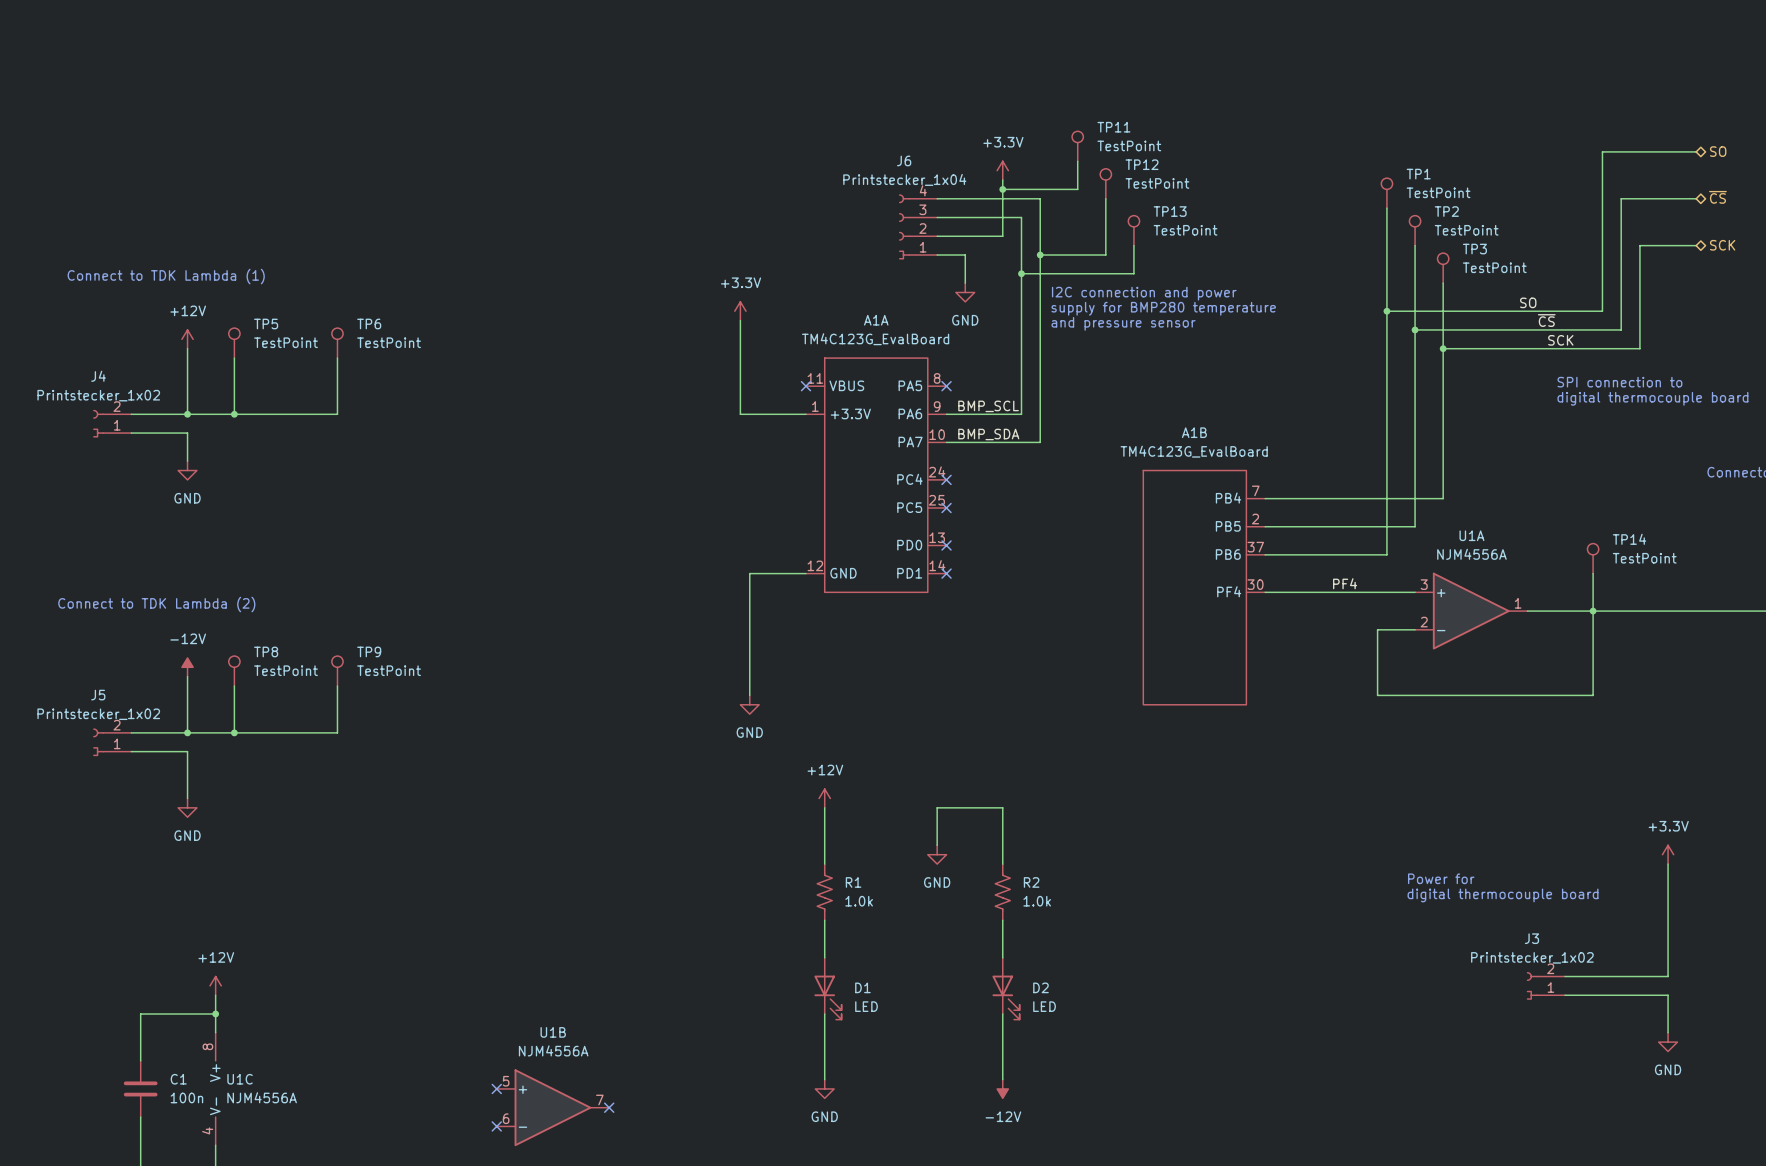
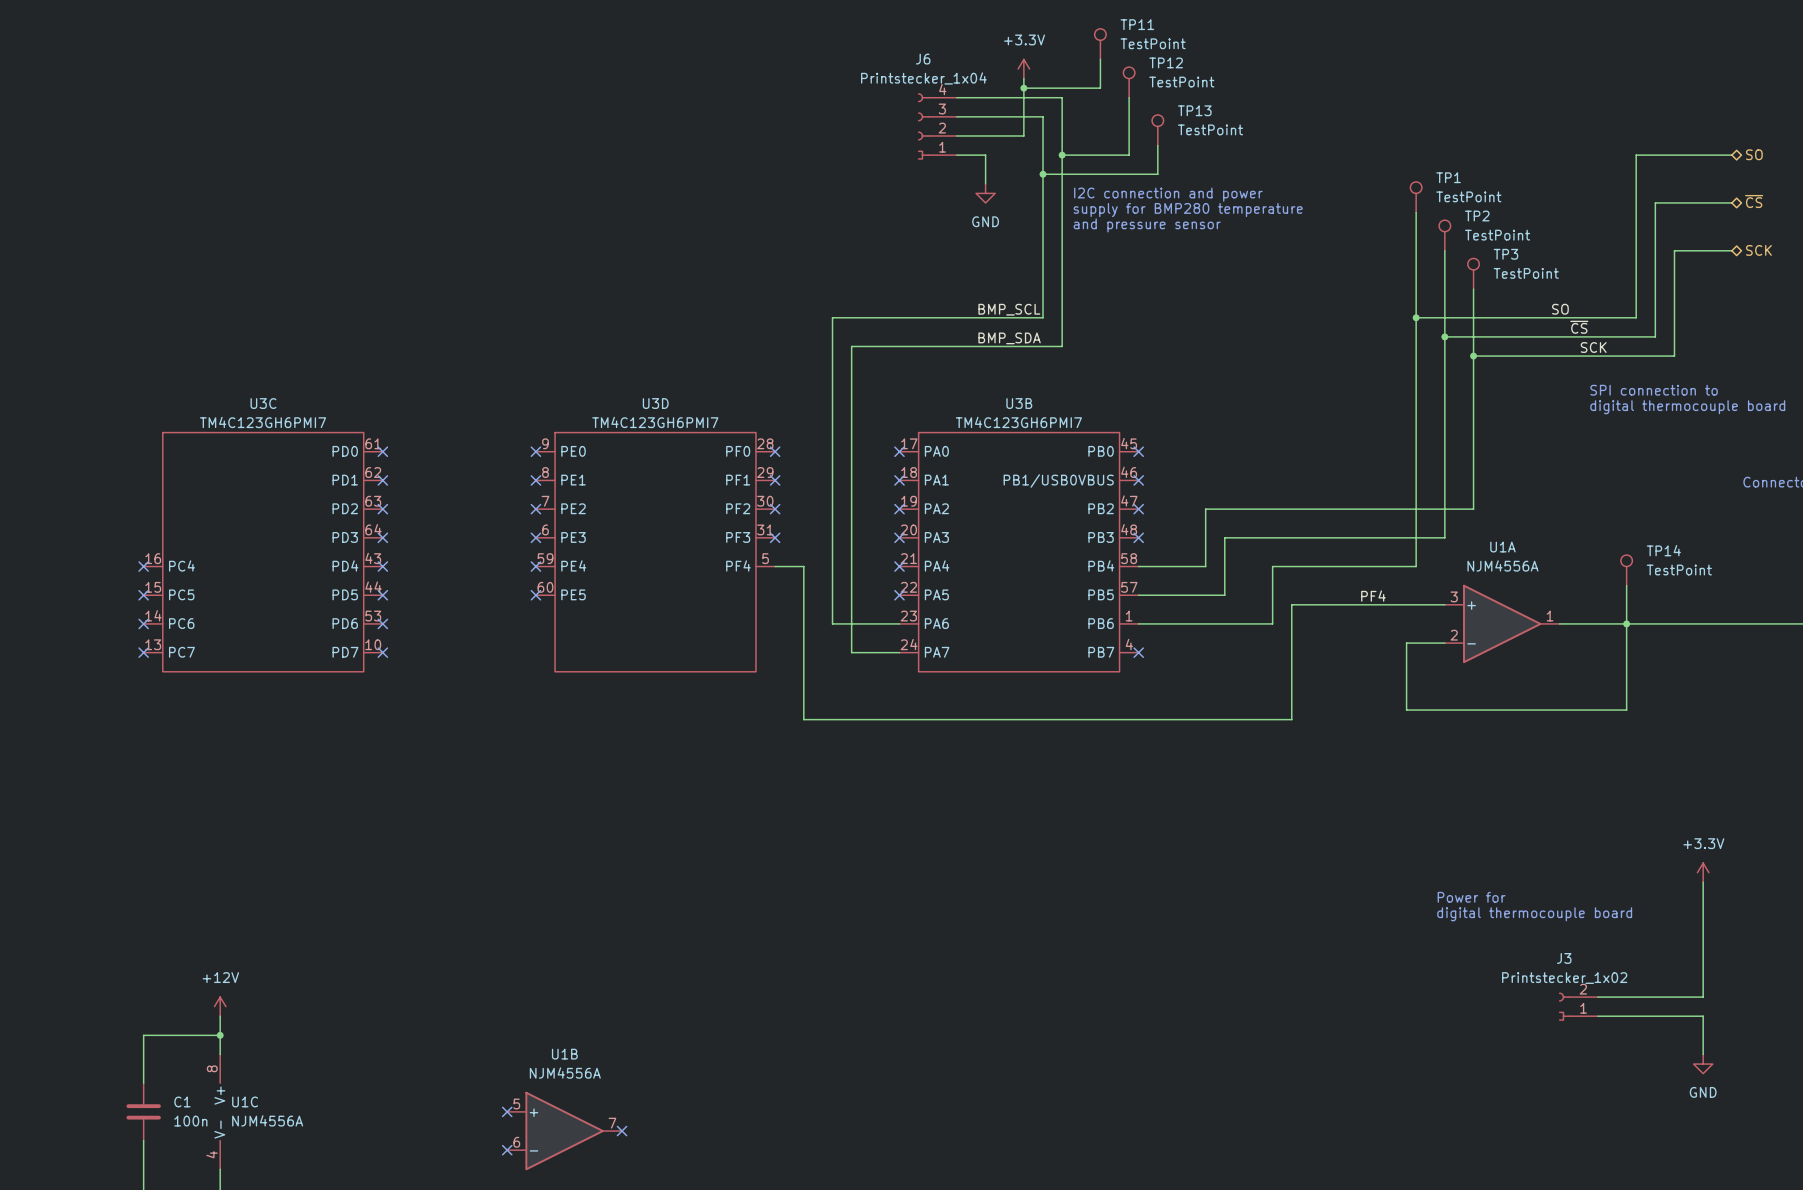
junction: none -> (1023, 88)
TP11 position: (1077, 146) -> (1100, 44)
junction: none -> (1062, 155)
wire: (1077, 161) (1077, 189) (1002, 189) -> (1100, 59) (1100, 88) (1023, 88)
power symbol position: +3.3V (1002, 170) -> +3.3V (1023, 69)
junction: none -> (1043, 174)
wire: (1002, 180) (1002, 236) (937, 236) -> (1023, 78) (1023, 135) (956, 135)
TP12 position: (1105, 183) -> (1129, 82)
junction: (1002, 189) -> none
wire: (937, 198) (1040, 198) -> (956, 97) (1062, 97) (1062, 202)
wire: (1105, 198) (1105, 255) (1040, 255) -> (1129, 97) (1129, 155) (1062, 155)
wire: (937, 217) (1021, 217) -> (956, 116) (1043, 116) (1043, 222)
J6 position: (918, 226) -> (937, 126)
TP13 position: (1133, 230) -> (1157, 130)
wire: (1133, 245) (1133, 273) (1021, 273) -> (1157, 145) (1157, 174) (1043, 174)
wire: (937, 255) (965, 255) (965, 283) -> (956, 155) (985, 155) (985, 183)
junction: (1040, 255) -> none
junction: (1021, 273) -> none
text: Connect to TDK Lambda (1) (166, 276) -> none
power symbol position: GND (965, 292) -> GND (985, 193)
text position: I2C connection and power (1144, 293) -> I2C connection and power (1168, 194)
text position: supply for BMP280 temperature (1163, 308) -> supply for BMP280 temperature (1188, 210)
power symbol: +3.3V (740, 311) -> none
wire: (1021, 311) (1021, 414) (946, 414) -> (1043, 317) (832, 317) (832, 623) (899, 623)
wire: (740, 320) (740, 414) (805, 414) -> none
text position: and pressure sensor (1123, 323) -> and pressure sensor (1147, 225)
power symbol: +12V (187, 339) -> none
wire: (1040, 339) (1040, 442) (946, 442) -> (1062, 346) (851, 346) (851, 652) (899, 652)
TP5: TestPoint (234, 343) -> none
TP6: TestPoint (337, 343) -> none
wire: (187, 348) (187, 414) -> none
wire: (234, 358) (234, 414) -> none
wire: (337, 358) (337, 414) (131, 414) -> none
no-connect mark: (805, 386) -> none
no-connect mark: (946, 386) -> none
label position: BMP_SCL (988, 406) -> BMP_SCL (1009, 309)
junction: (187, 414) -> none
junction: (234, 414) -> none
J4: Printstecker_1x02 (112, 423) -> none
wire: (131, 433) (187, 433) (187, 461) -> none
label position: BMP_SDA (988, 434) -> BMP_SDA (1009, 338)
no-connect mark: none -> (382, 451)
no-connect mark: none -> (535, 451)
no-connect mark: none -> (775, 451)
no-connect mark: none -> (899, 451)
no-connect mark: none -> (1138, 451)
power symbol: GND (187, 470) -> none
no-connect mark: none -> (382, 480)
no-connect mark: none -> (535, 480)
no-connect mark: none -> (775, 480)
no-connect mark: none -> (899, 480)
no-connect mark: none -> (1138, 480)
A1A: TM4C123G_EvalBoard (876, 475) -> none
no-connect mark: (946, 479) -> none
no-connect mark: none -> (382, 509)
no-connect mark: none -> (535, 509)
no-connect mark: none -> (775, 509)
no-connect mark: none -> (899, 509)
no-connect mark: none -> (1138, 509)
wire: none -> (1291, 509) (1205, 509) (1205, 566) (1138, 566)
no-connect mark: (946, 508) -> none
no-connect mark: none -> (382, 537)
no-connect mark: none -> (535, 537)
no-connect mark: none -> (775, 537)
no-connect mark: none -> (899, 537)
no-connect mark: none -> (1138, 537)
wire: none -> (1291, 537) (1224, 537) (1224, 595) (1138, 595)
U3C: none -> TM4C123GH6PMI7 (263, 552)
U3D: none -> TM4C123GH6PMI7 (655, 552)
U3B: none -> TM4C123GH6PMI7 (1019, 552)
no-connect mark: (946, 545) -> none
no-connect mark: none -> (143, 566)
no-connect mark: none -> (382, 566)
no-connect mark: none -> (535, 566)
wire: none -> (775, 566) (803, 566) (803, 719) (1291, 719) (1291, 604)
no-connect mark: none -> (899, 566)
wire: none -> (1291, 566) (1272, 566) (1272, 623) (1138, 623)
wire: (805, 573) (749, 573) (749, 695) -> none
no-connect mark: (946, 573) -> none
no-connect mark: none -> (143, 595)
no-connect mark: none -> (382, 595)
no-connect mark: none -> (535, 595)
no-connect mark: none -> (899, 595)
A1B: TM4C123G_EvalBoard (1204, 587) -> none
text: Connect to TDK Lambda (2) (156, 604) -> none
no-connect mark: none -> (143, 623)
no-connect mark: none -> (382, 623)
no-connect mark: none -> (143, 652)
no-connect mark: none -> (382, 652)
no-connect mark: none -> (1138, 652)
power symbol: -12V (187, 667) -> none
TP8: TestPoint (234, 671) -> none
TP9: TestPoint (337, 671) -> none
wire: (187, 676) (187, 732) -> none
wire: (234, 686) (234, 732) -> none
wire: (337, 686) (337, 732) (131, 732) -> none
power symbol: GND (749, 704) -> none
junction: (187, 732) -> none
junction: (234, 732) -> none
J5: Printstecker_1x02 (112, 742) -> none
wire: (131, 751) (187, 751) (187, 798) -> none
power symbol: +12V (824, 798) -> none
power symbol: GND (187, 807) -> none
wire: (824, 807) (824, 864) -> none
wire: (937, 845) (937, 807) (1002, 807) (1002, 864) -> none
power symbol: GND (937, 854) -> none
R1: 1.0k (824, 892) -> none
R2: 1.0k (1002, 892) -> none
wire: (824, 920) (824, 957) -> none
wire: (1002, 920) (1002, 957) -> none
D1: LED (828, 988) -> none
D2: LED (1006, 988) -> none
wire: (824, 1014) (824, 1079) -> none
wire: (1002, 1014) (1002, 1079) -> none
power symbol: GND (824, 1088) -> none
power symbol: -12V (1002, 1088) -> none

